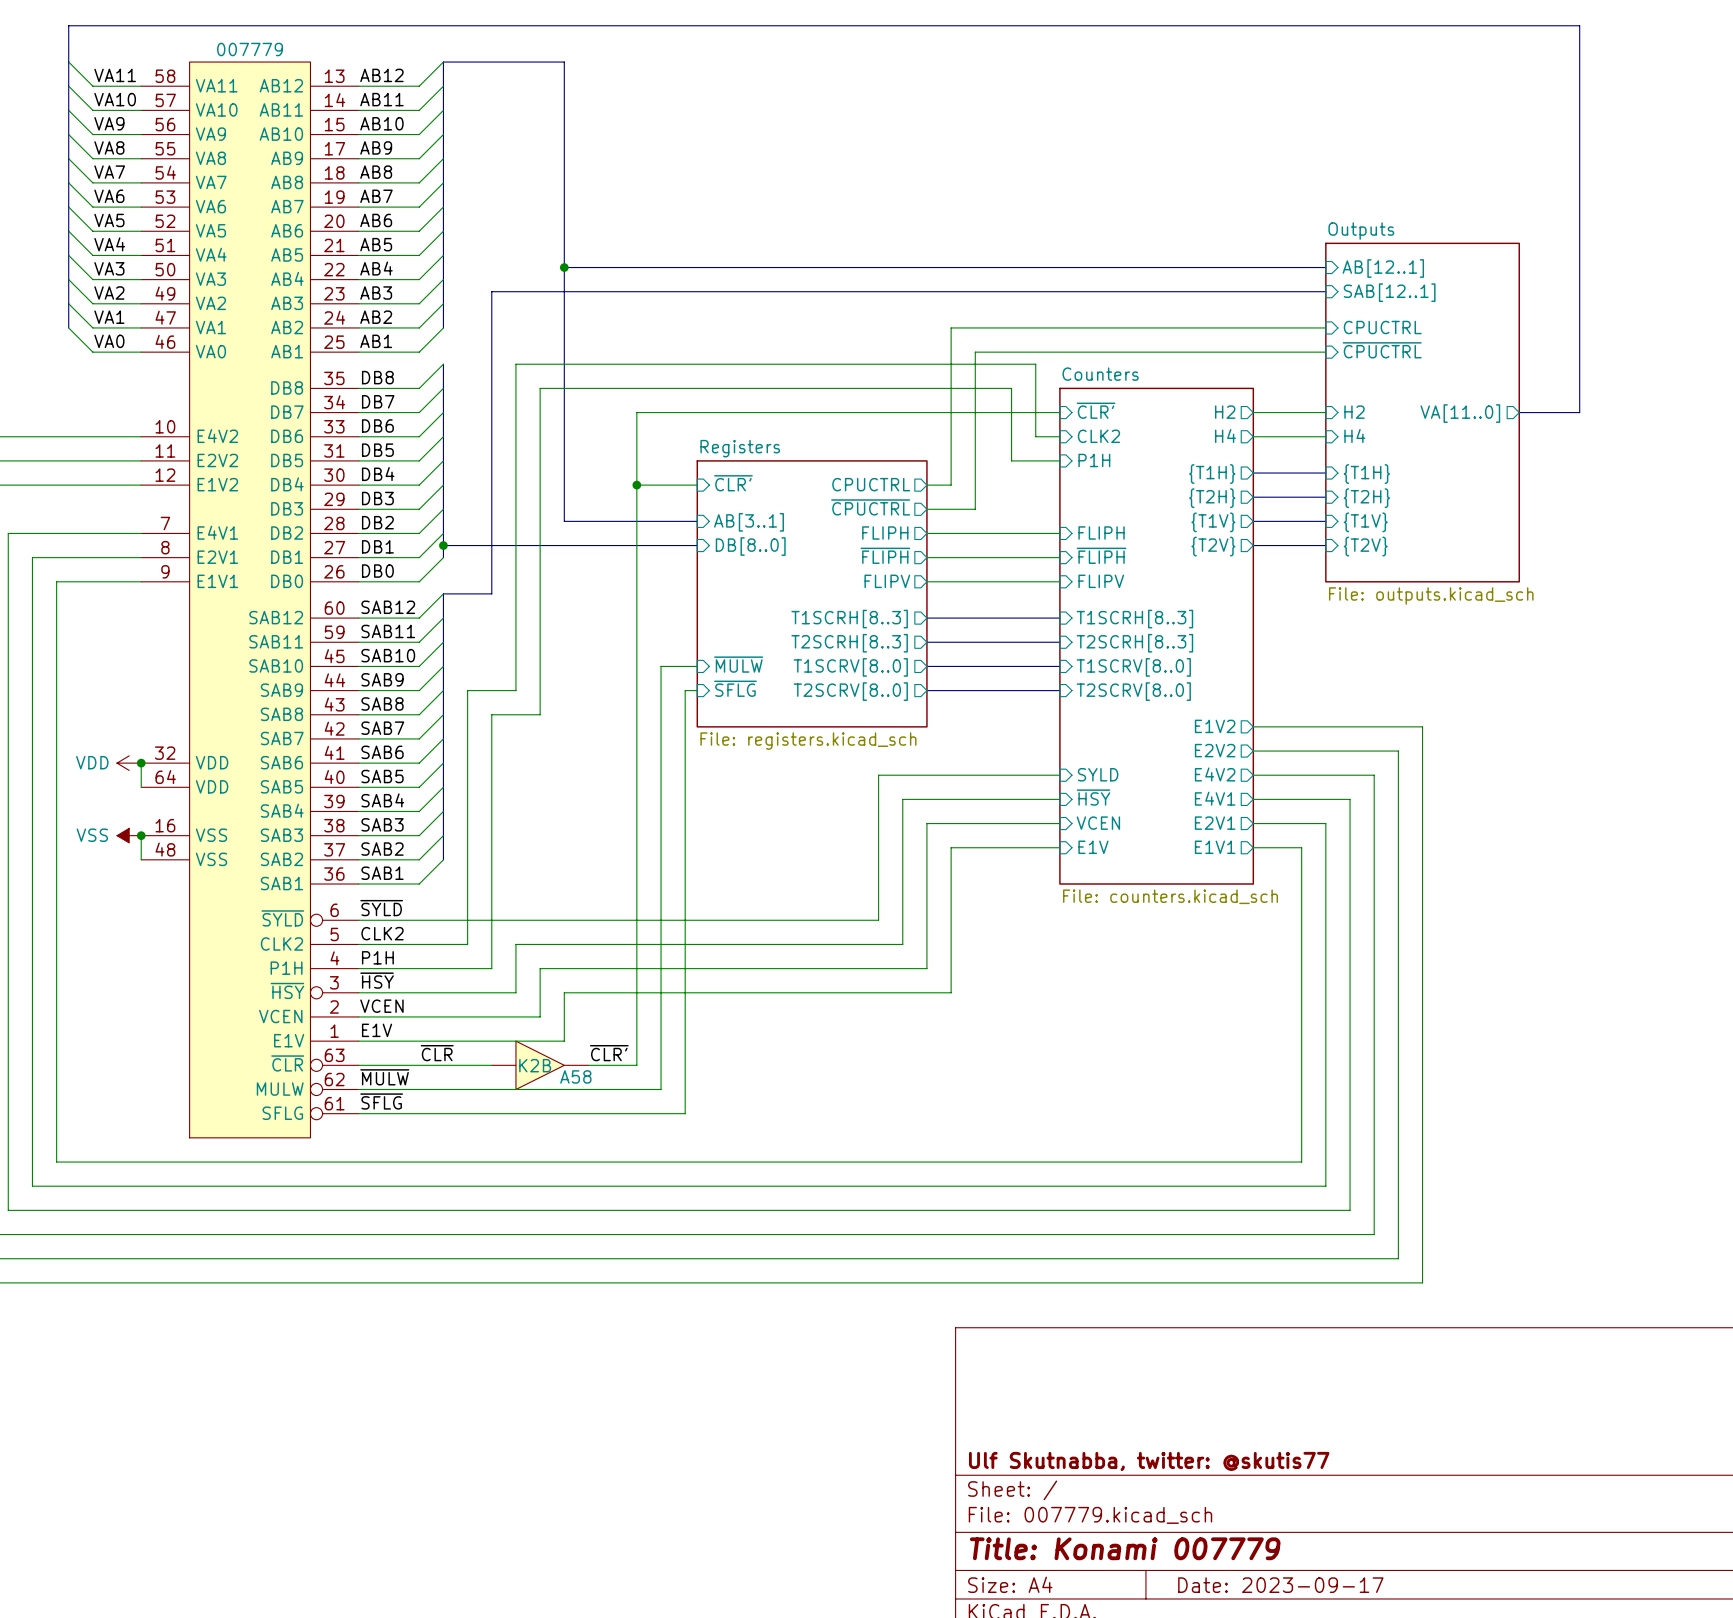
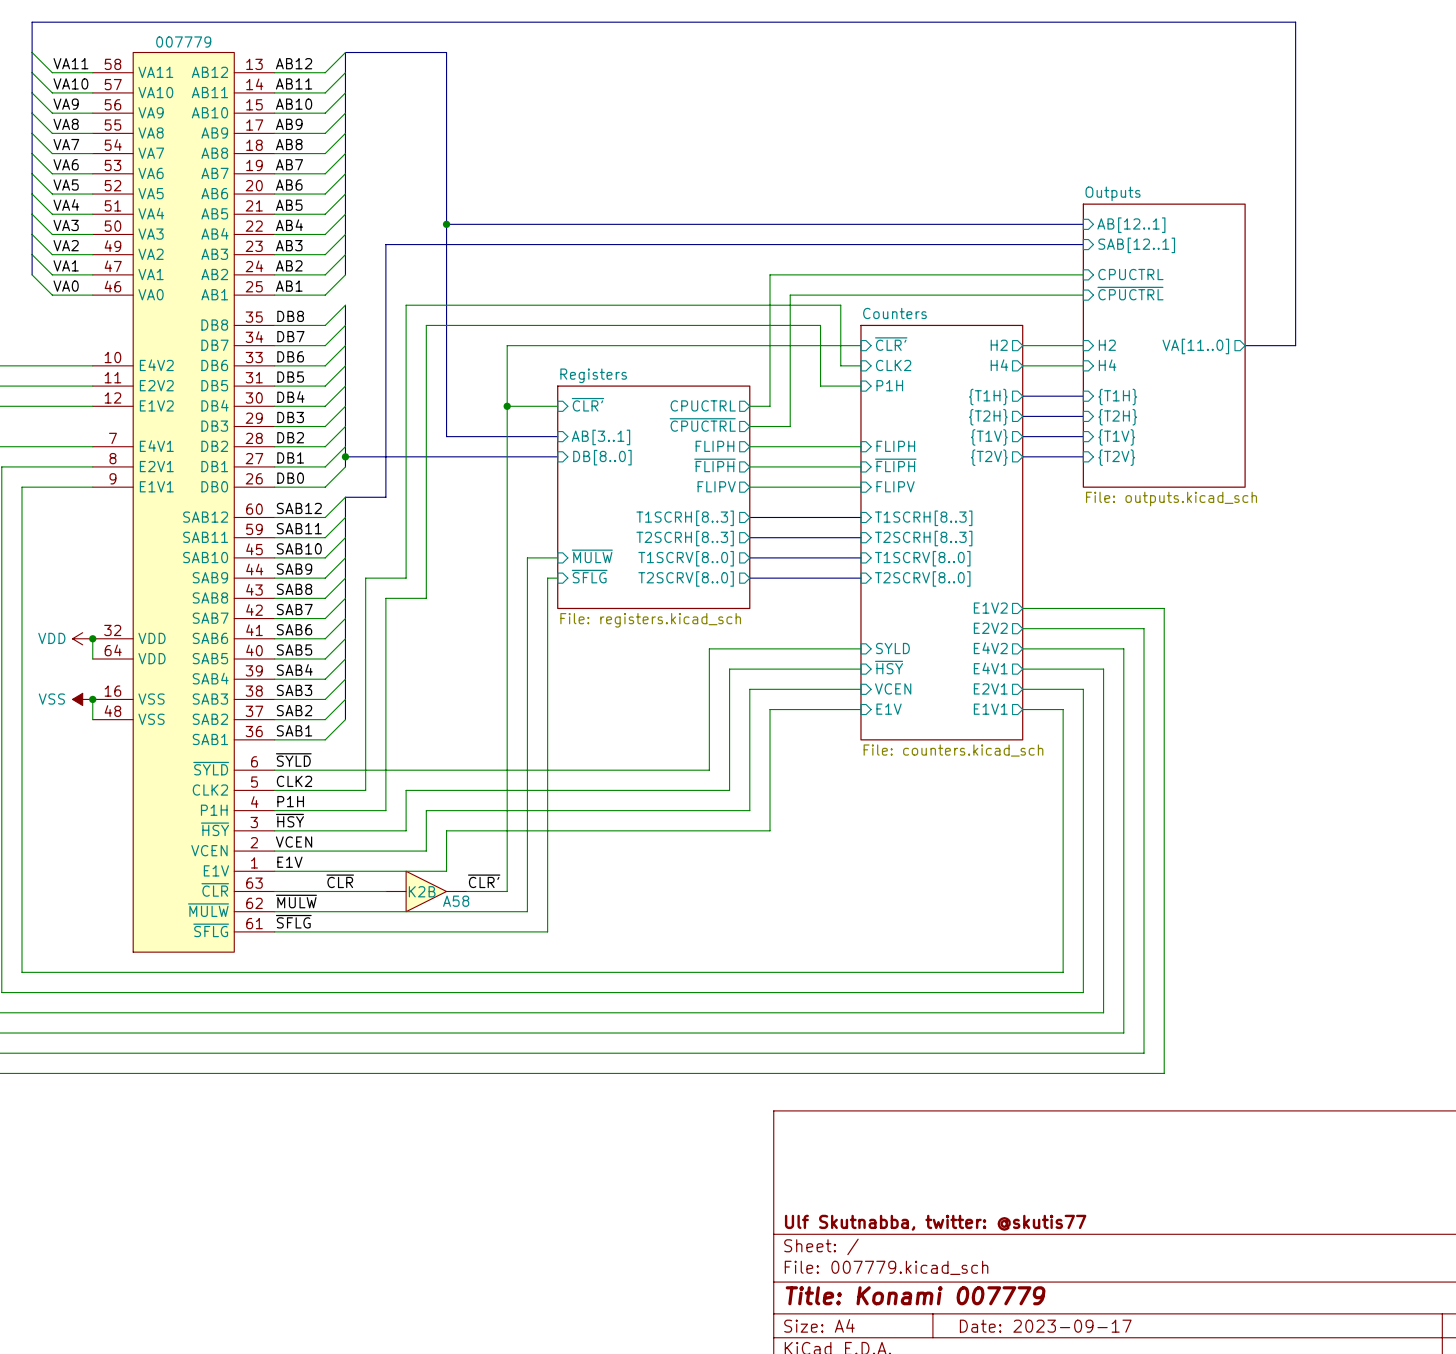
part symbol: [141, 62, 359, 1138] -> [92, 52, 275, 953]

